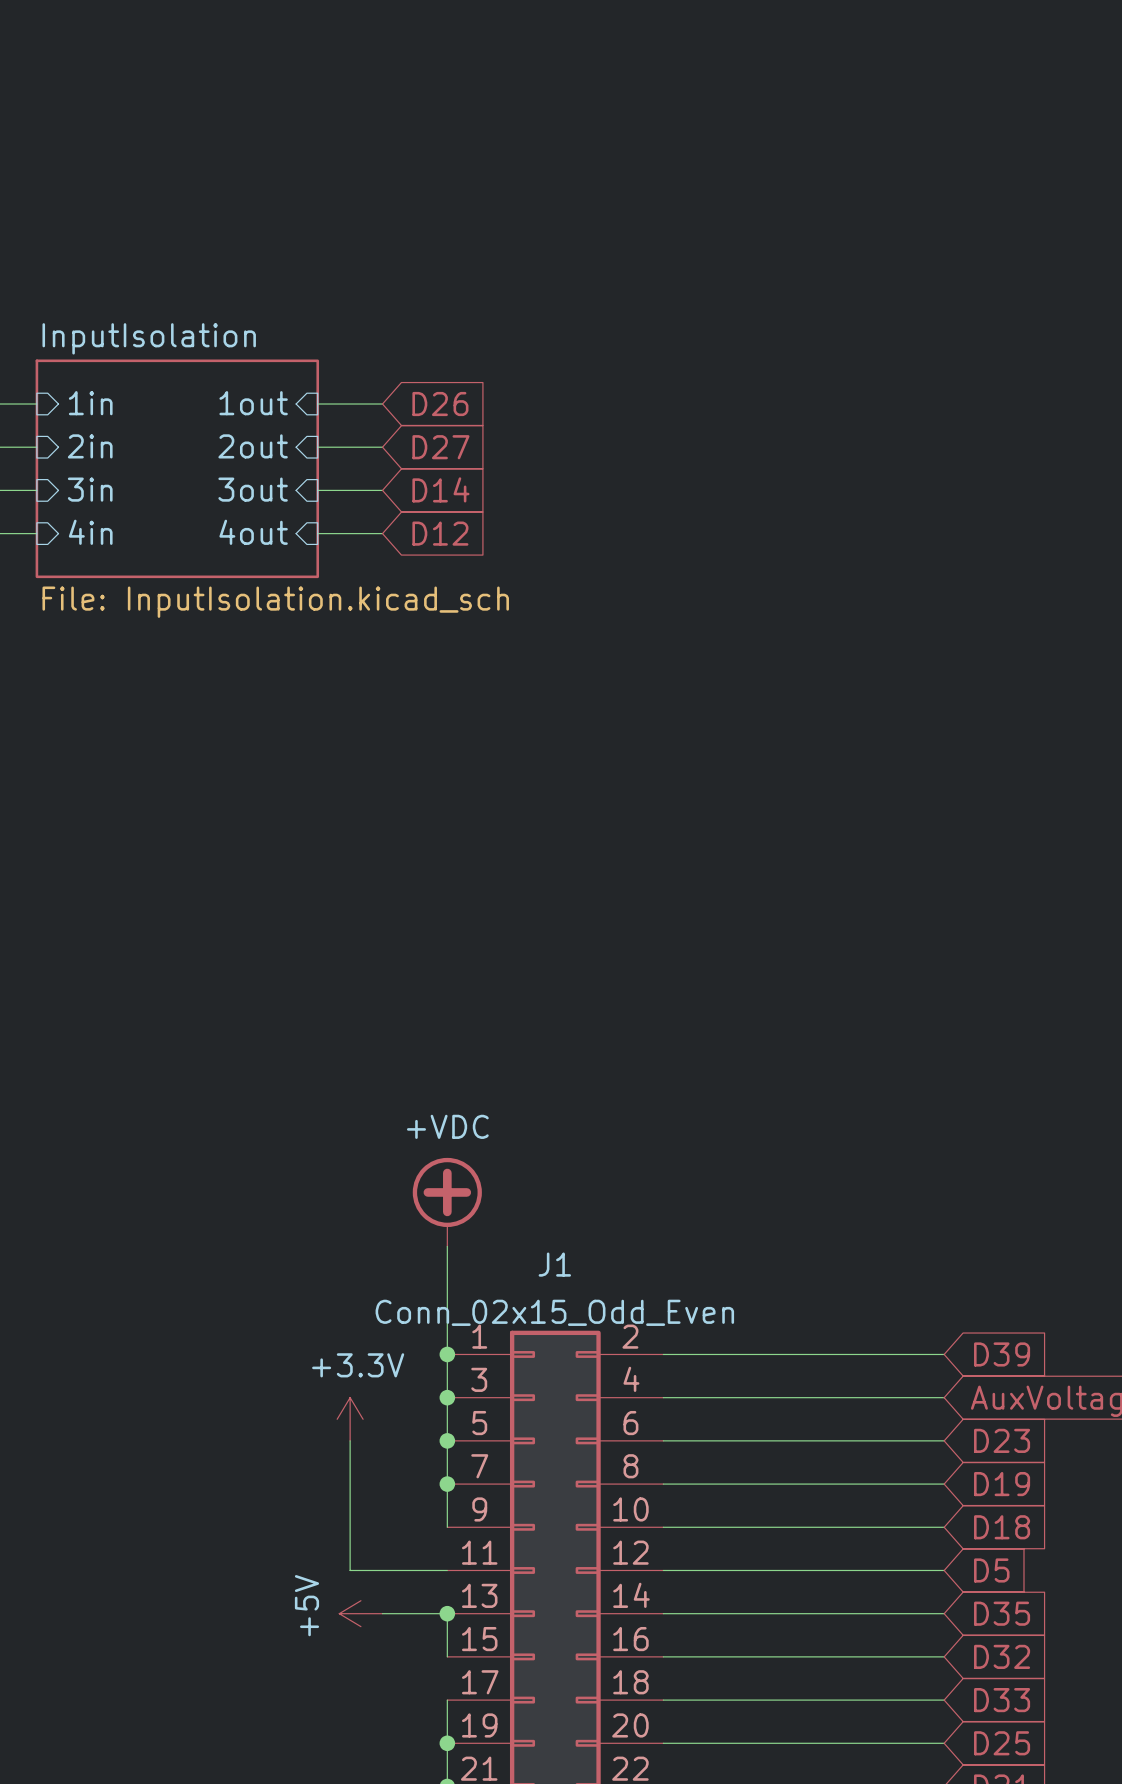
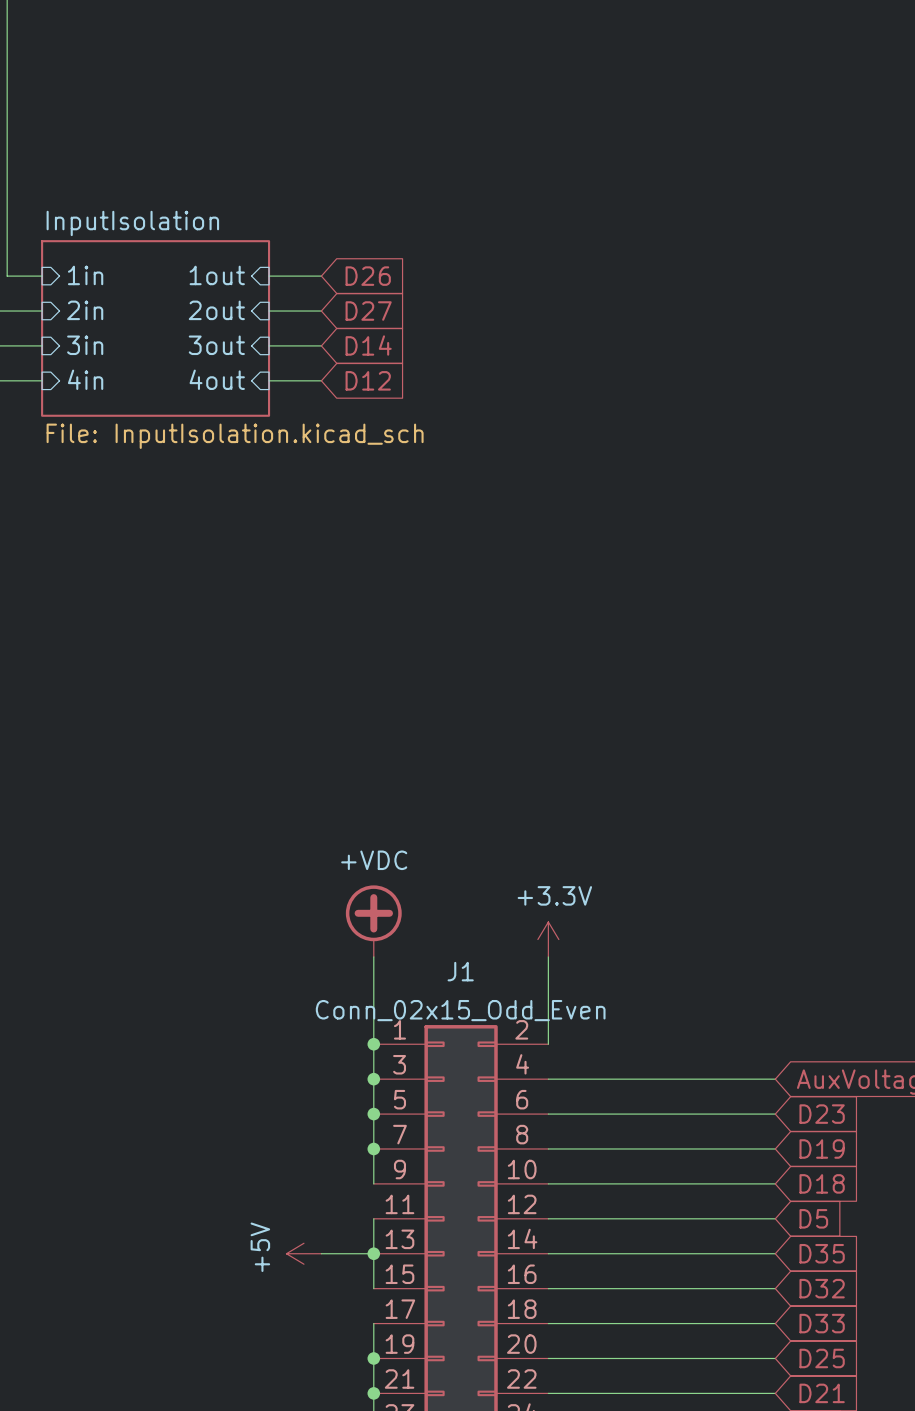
wire: (663, 1354) (944, 1354) -> (548, 1044) (548, 956)
global label: D39 (1002, 1354) -> none
power symbol position: +3.3V (350, 1419) -> +3.3V (548, 939)
wire: (350, 1440) (350, 1570) (447, 1570) -> (373, 1253) (373, 1218)

